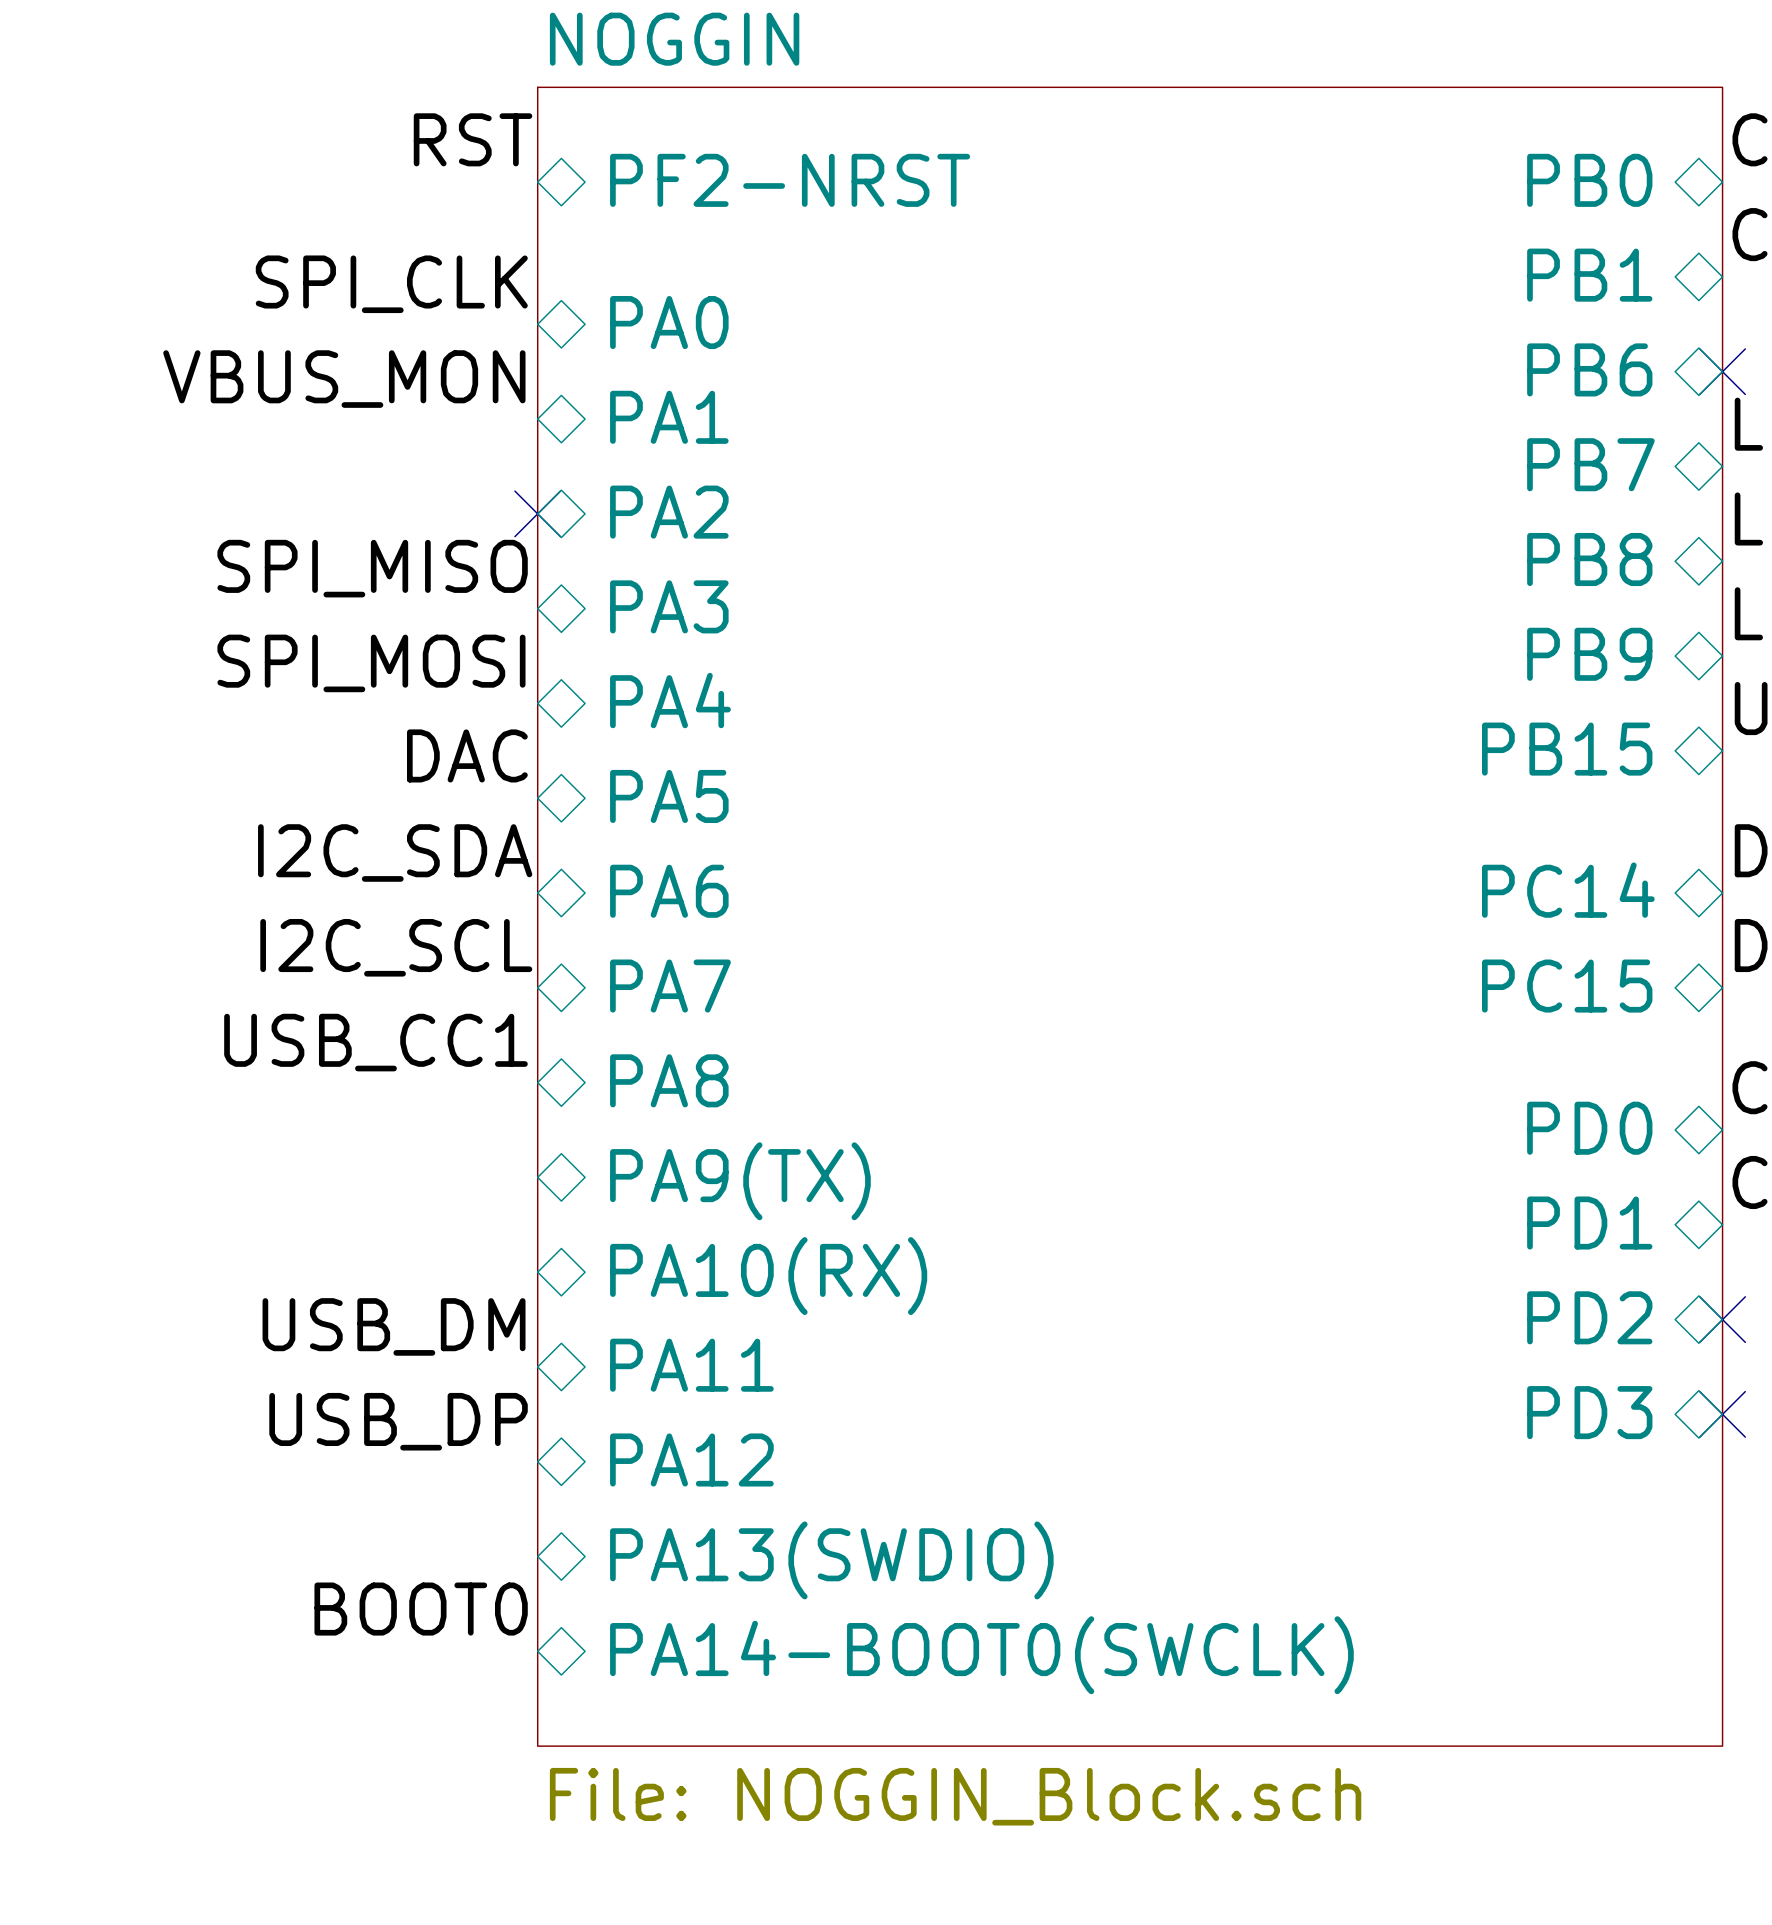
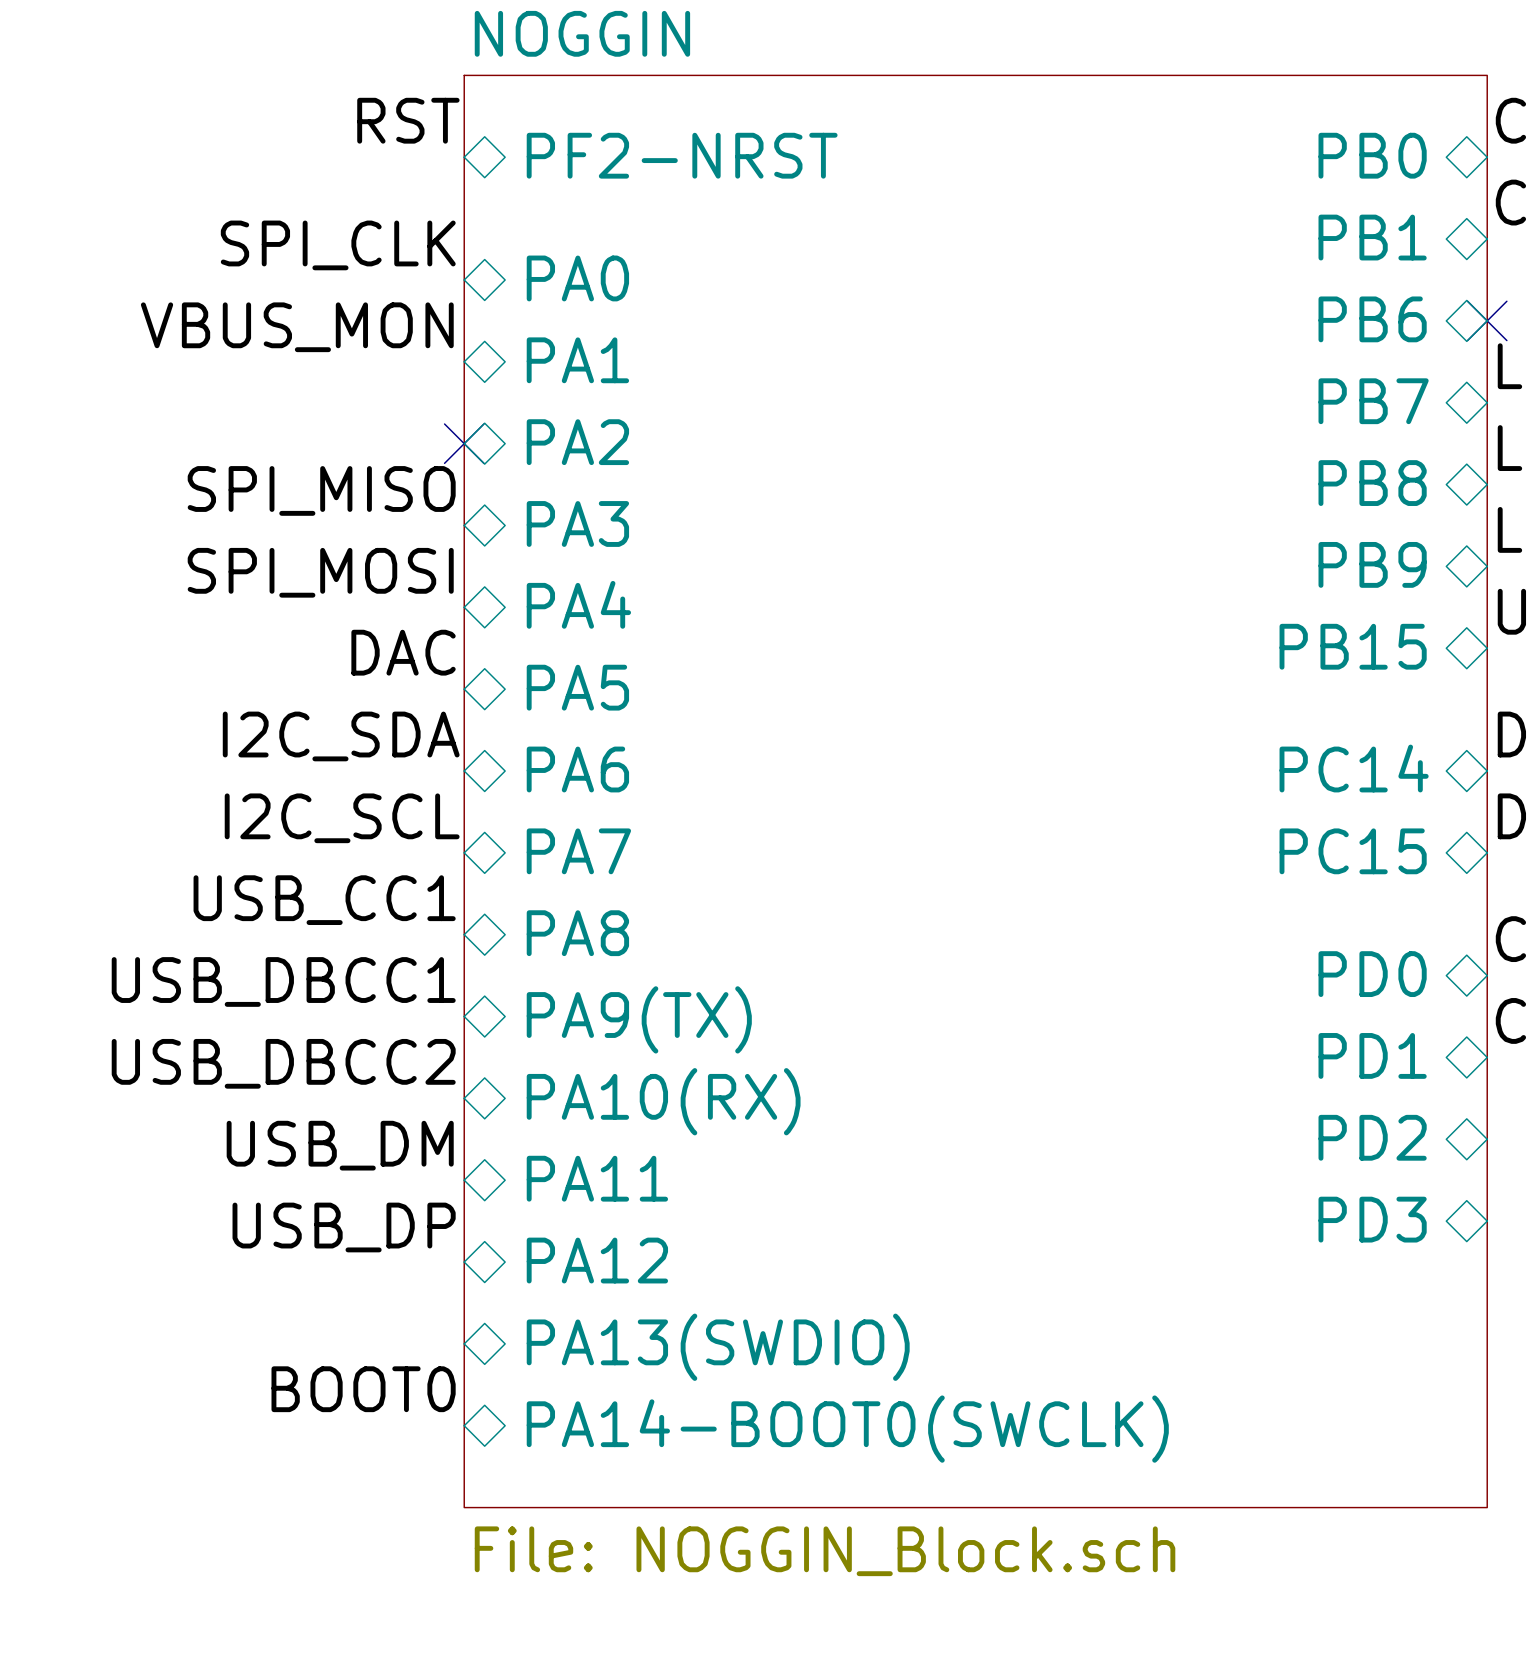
label: none -> USB_DBCC1 (283, 981)
label: none -> USB_DBCC2 (283, 1063)
no-connect mark: (1722, 1319) -> none
no-connect mark: (1722, 1414) -> none

